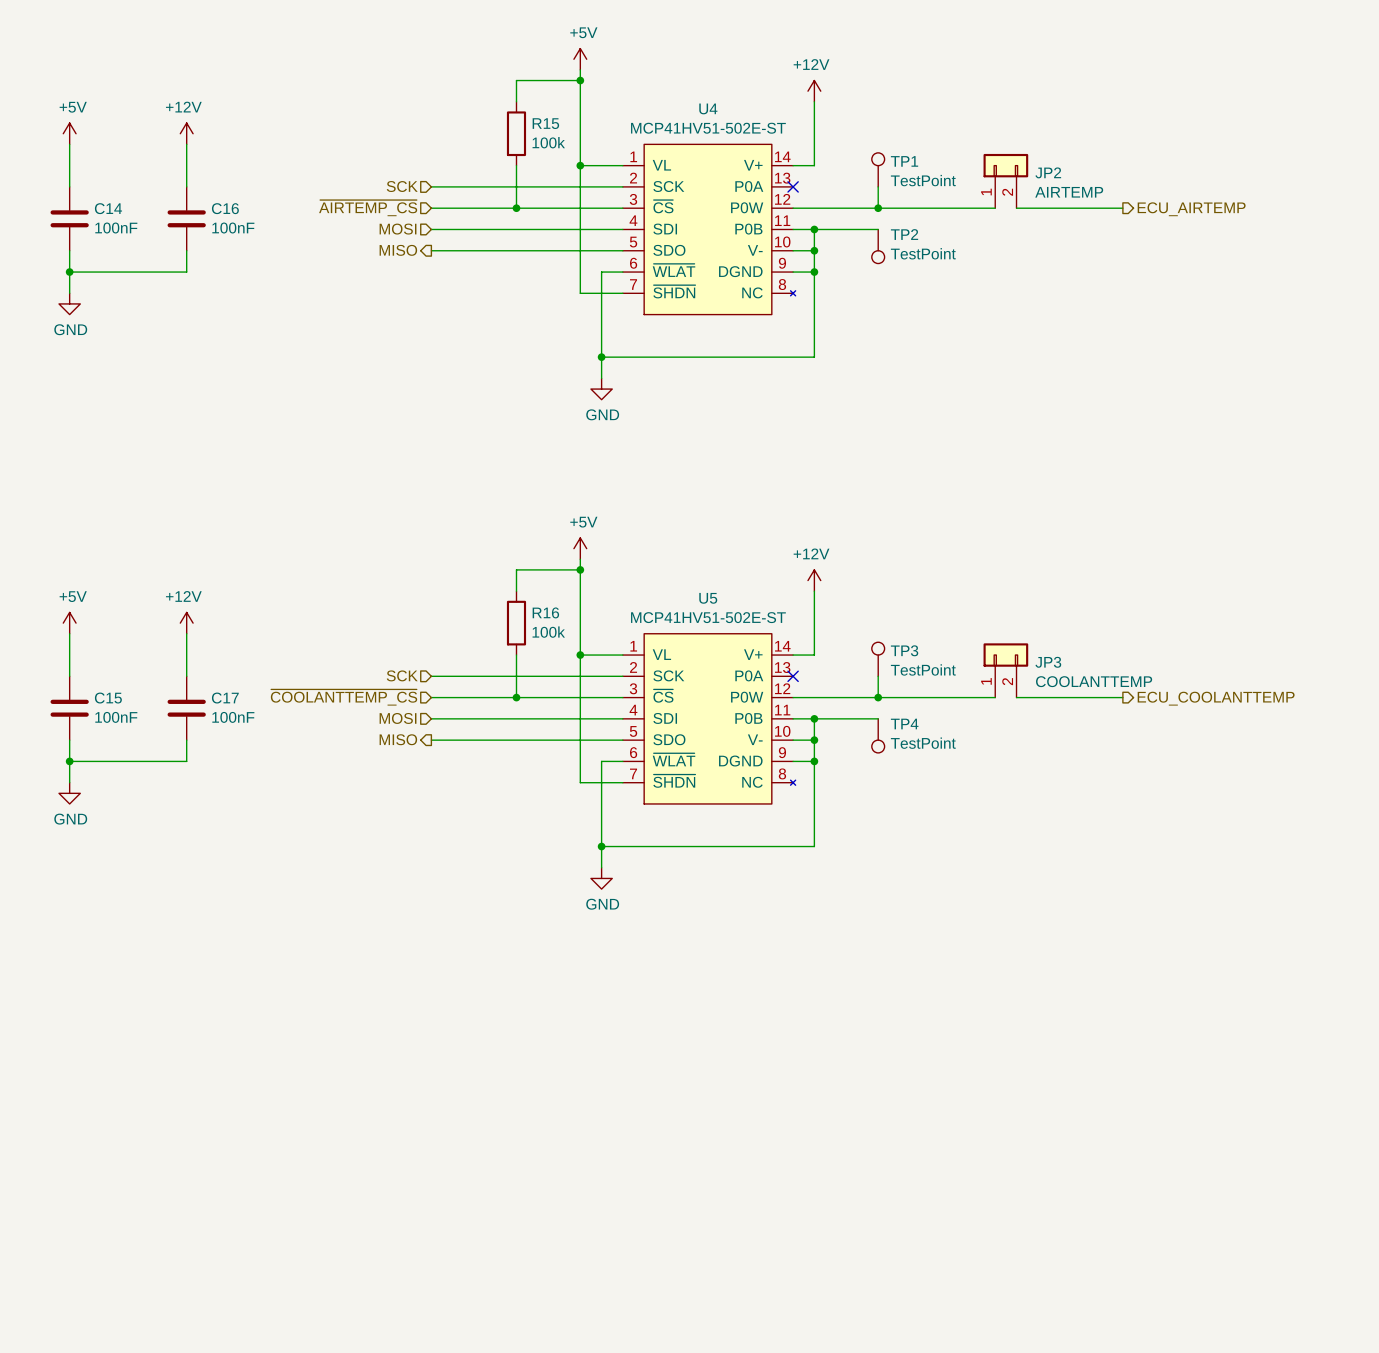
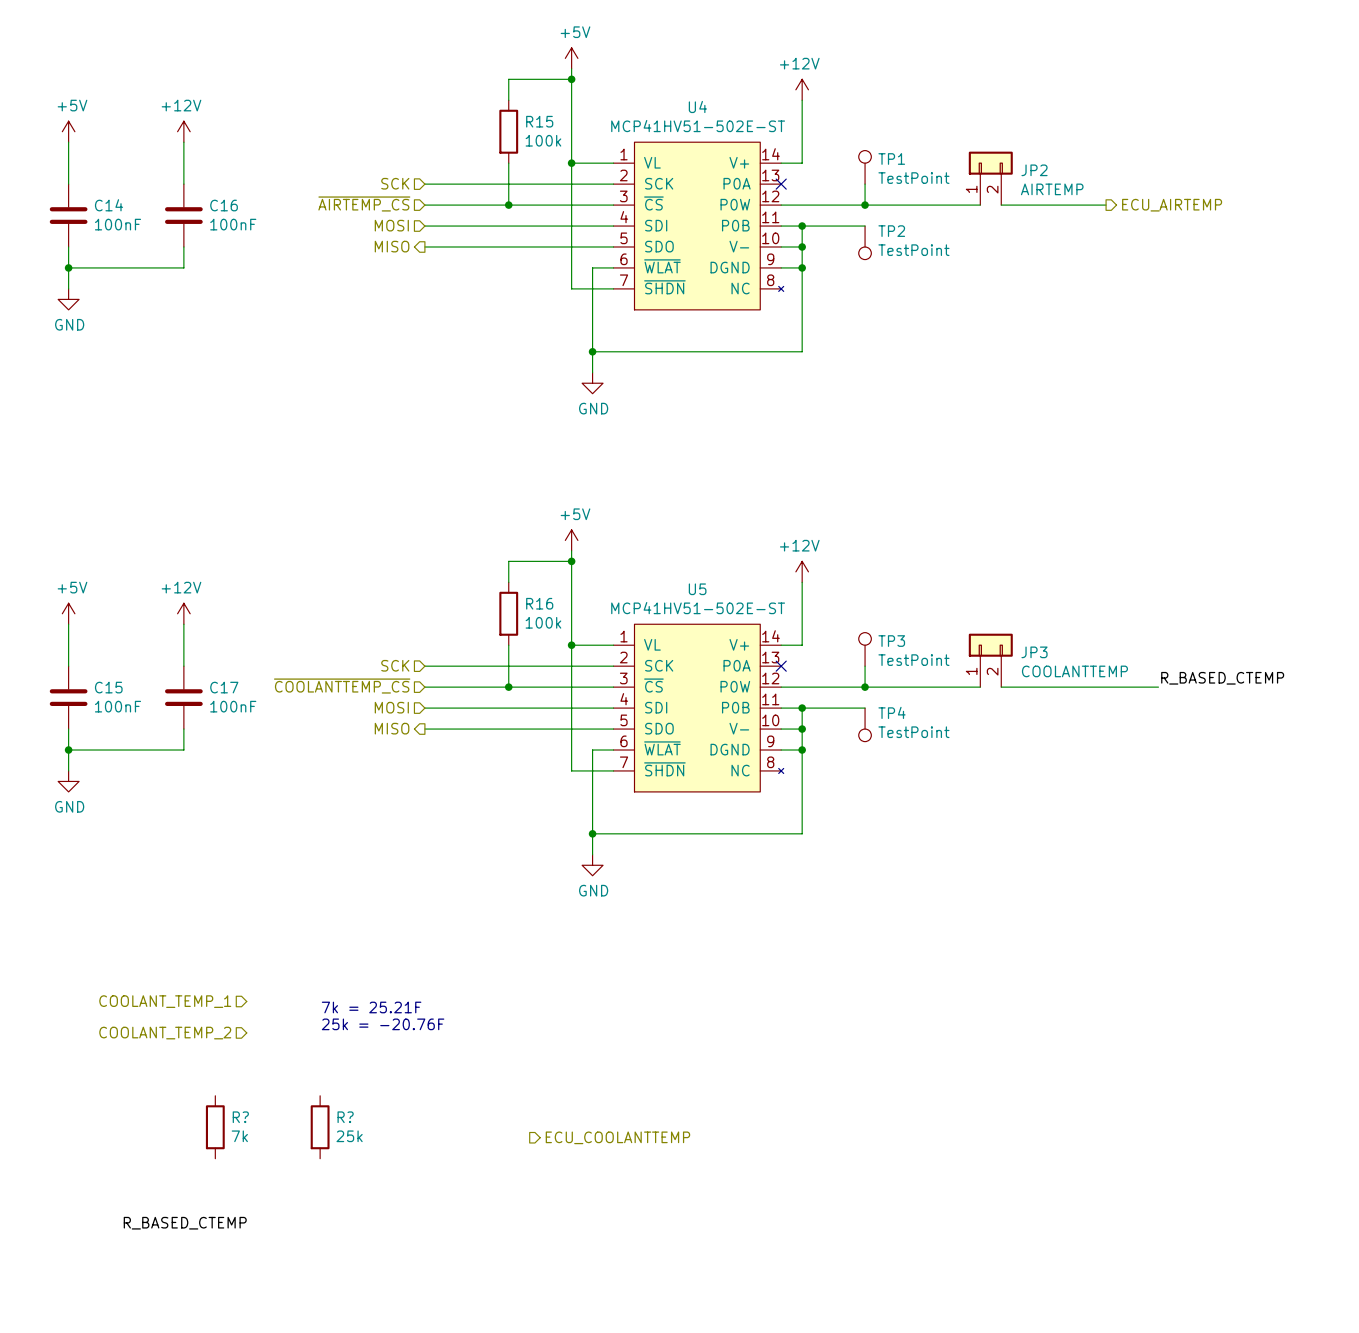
label: none -> R_BASED_CTEMP (1222, 678)
wire: none -> (1106, 687) (1158, 687)
hierarchical label: ECU_COOLANTTEMP (1216, 698) -> none
hierarchical label: none -> COOLANT_TEMP_1 (165, 1001)
text: none -> 7k = 25.21F (371, 1007)
text: none -> 25k = -20.76F (383, 1024)
hierarchical label: none -> COOLANT_TEMP_2 (165, 1033)
R?: none -> 7k (215, 1127)
R?: none -> 25k (320, 1127)
hierarchical label: none -> ECU_COOLANTTEMP (617, 1137)
label: none -> R_BASED_CTEMP (185, 1223)

